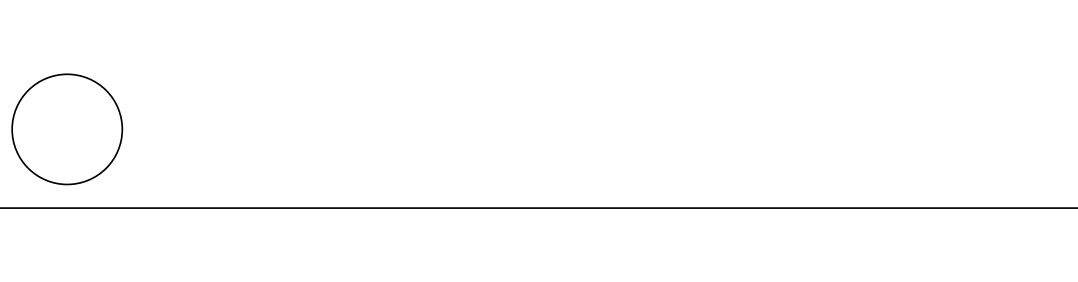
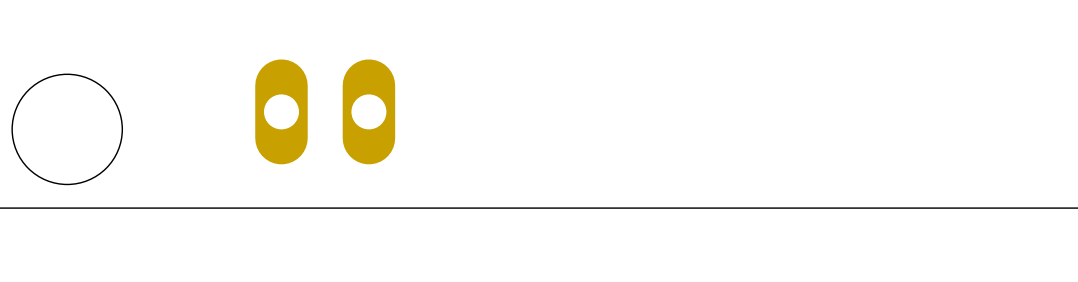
part: none -> (325, 111)

